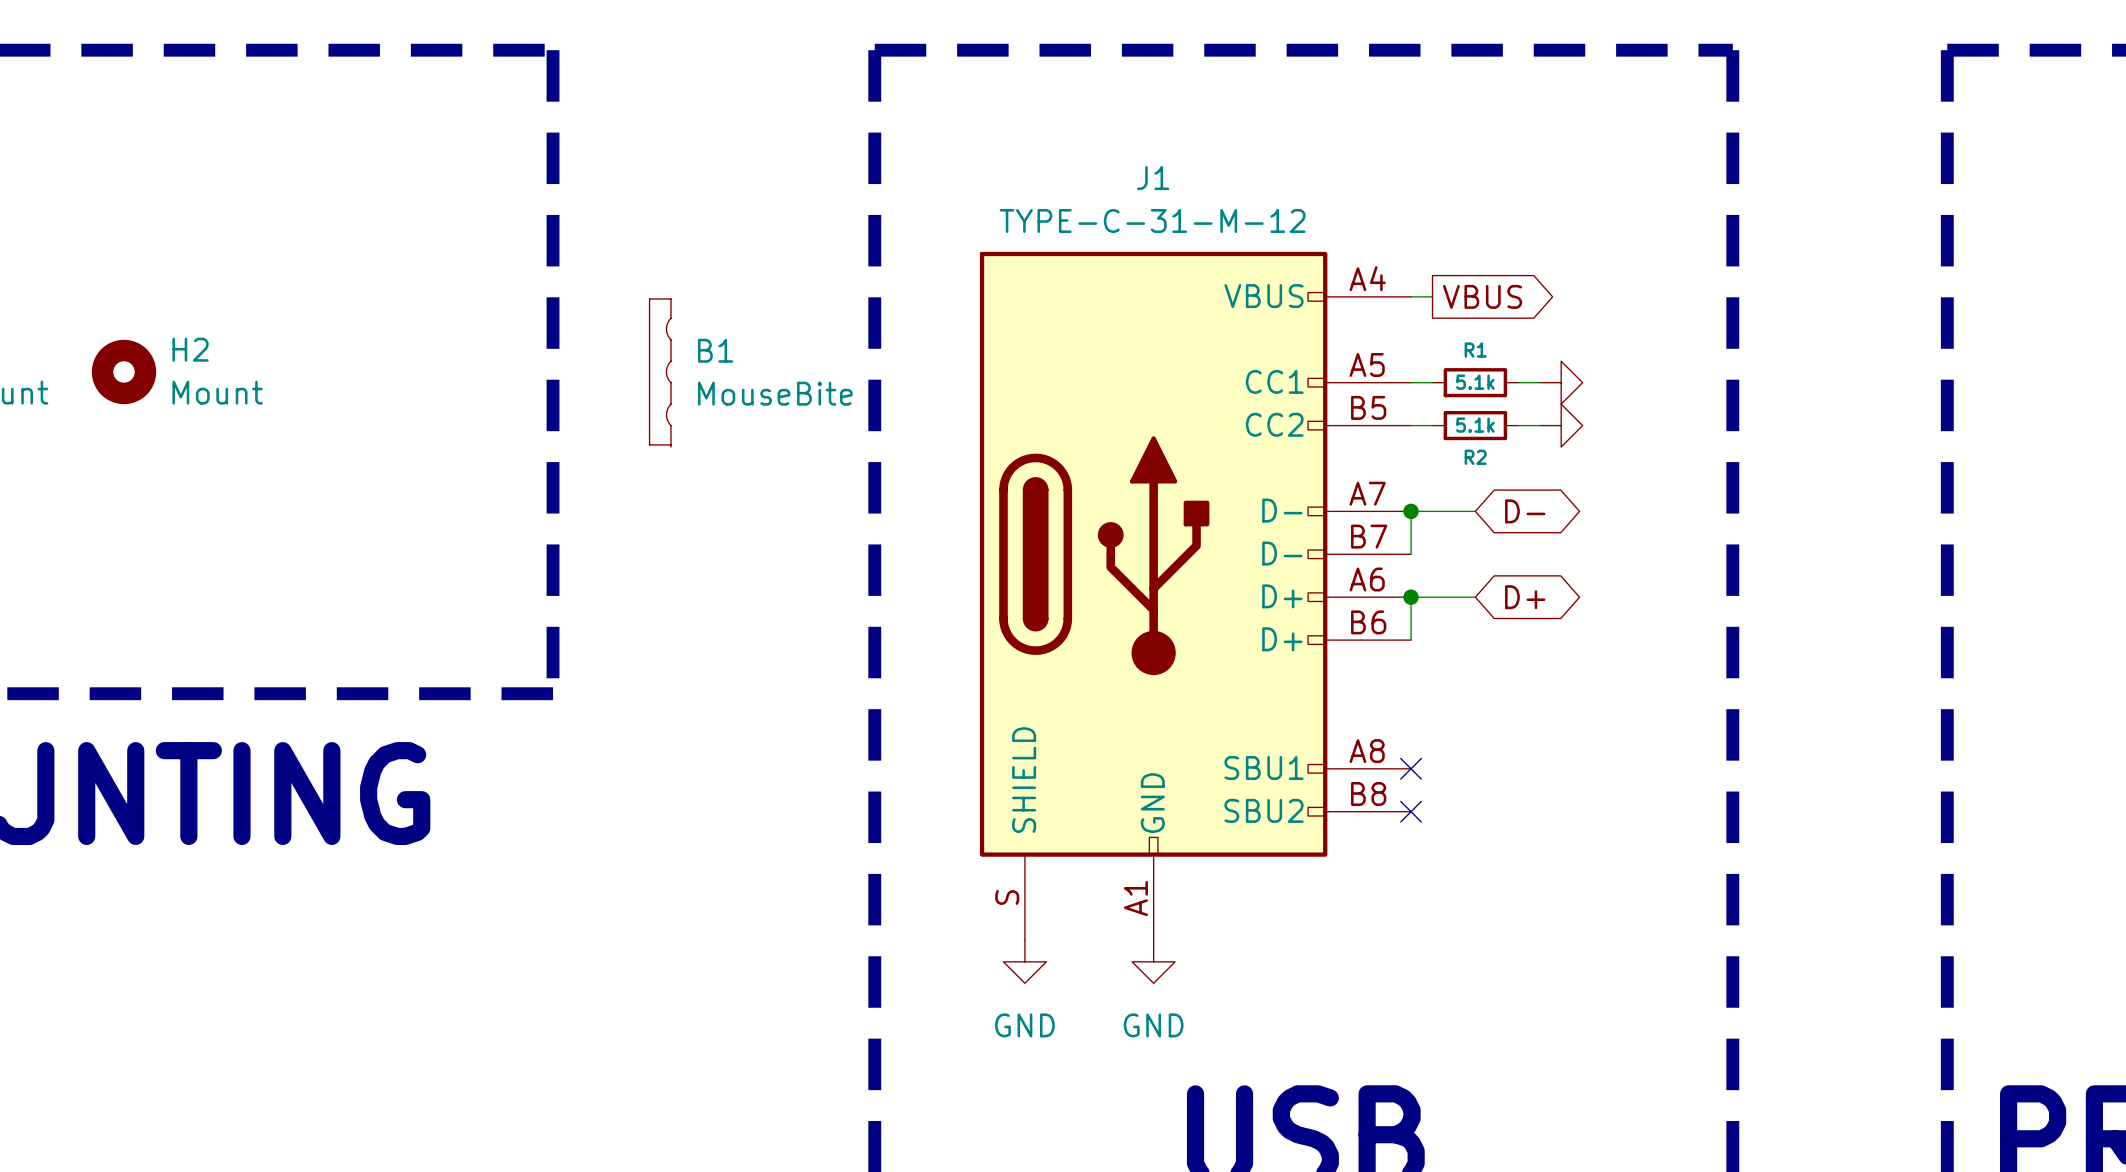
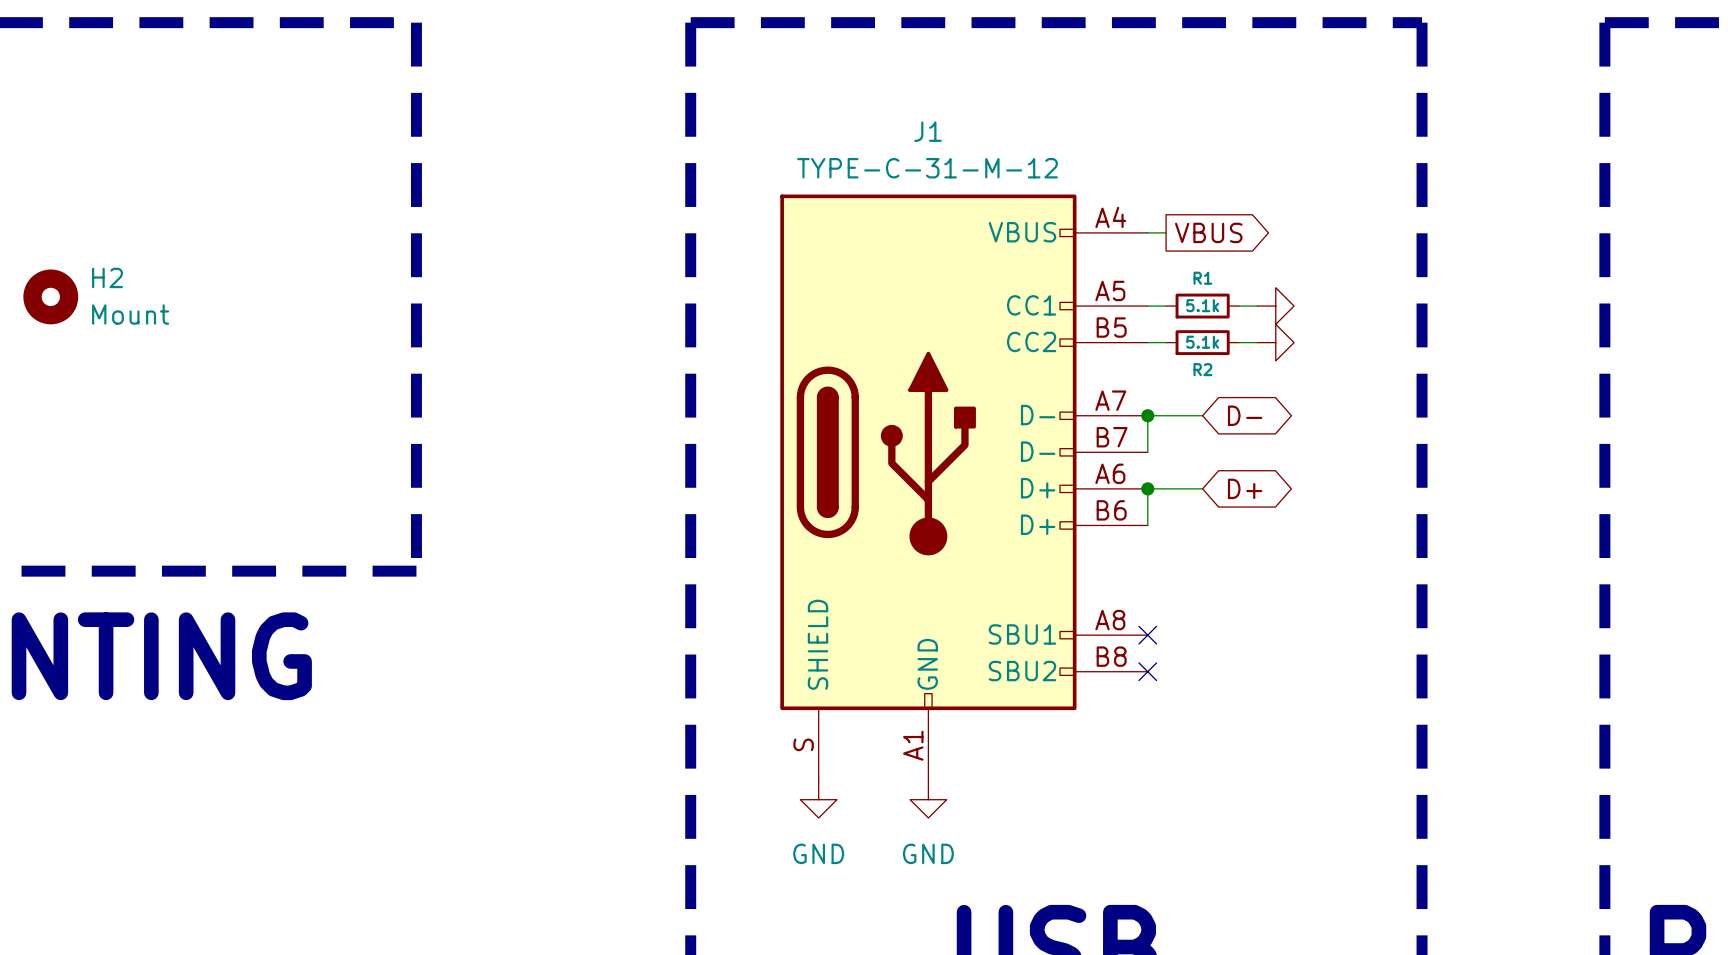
B1: MouseBite (660, 373) -> none

